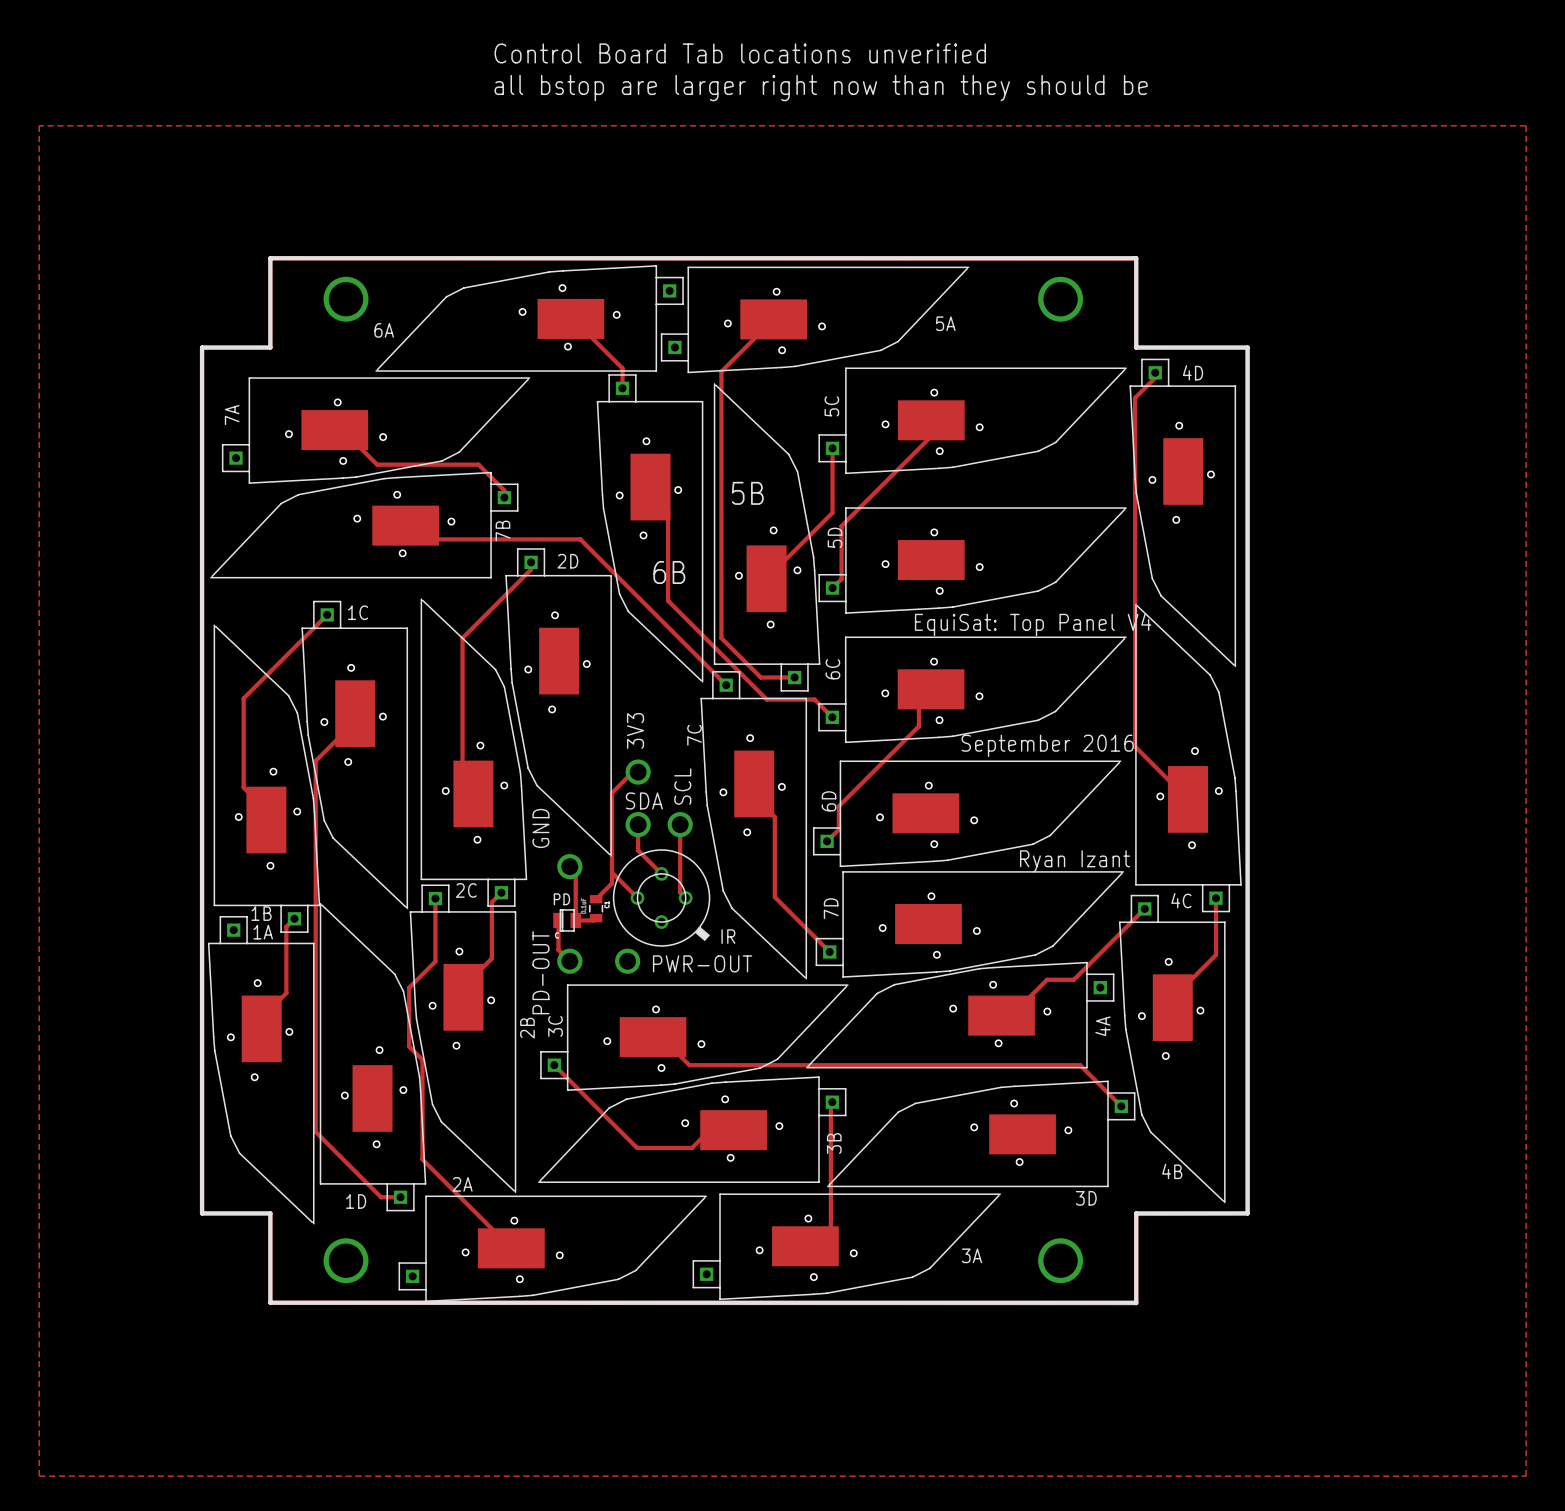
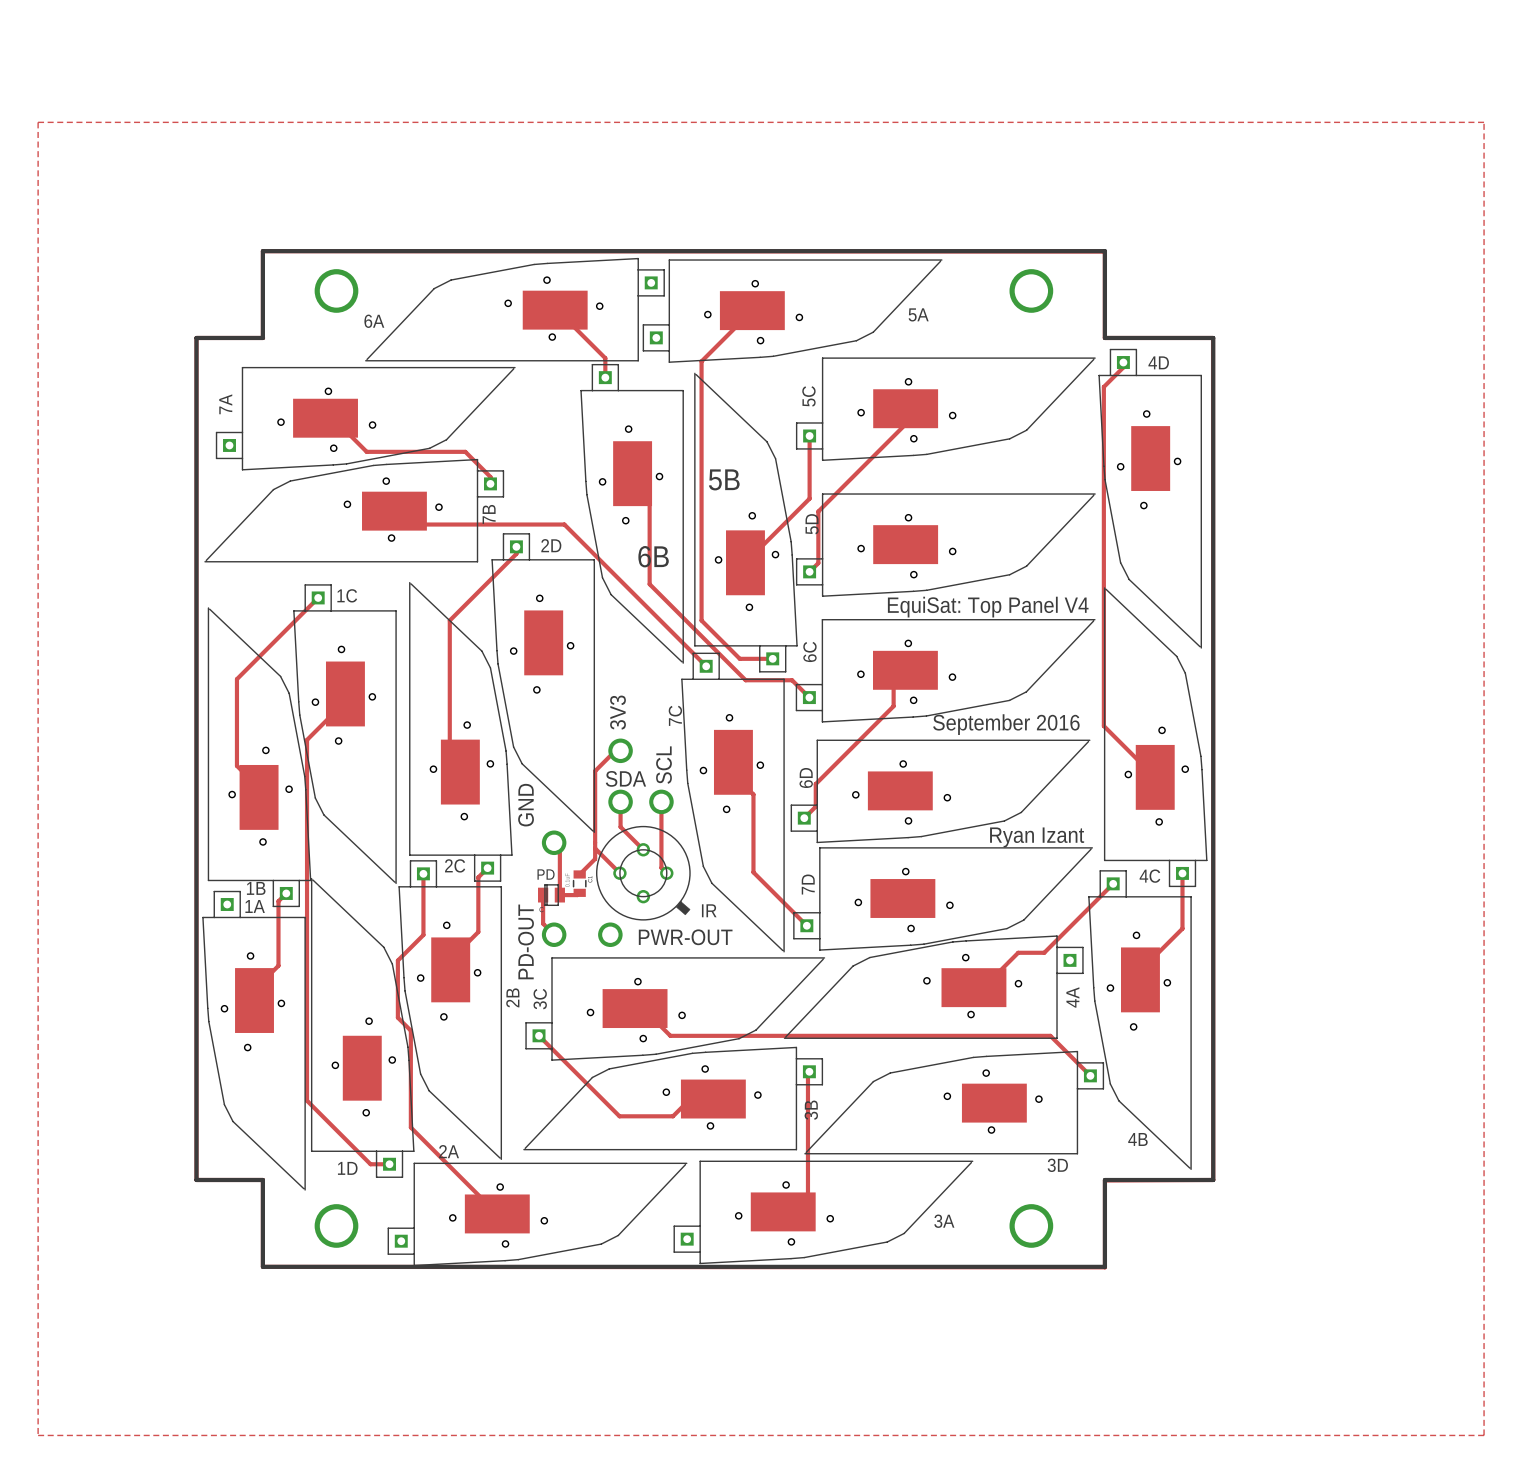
text: Control Board Tab locations unverified (740, 53) -> none
text: all bstop are larger right now than they should be (821, 88) -> none

